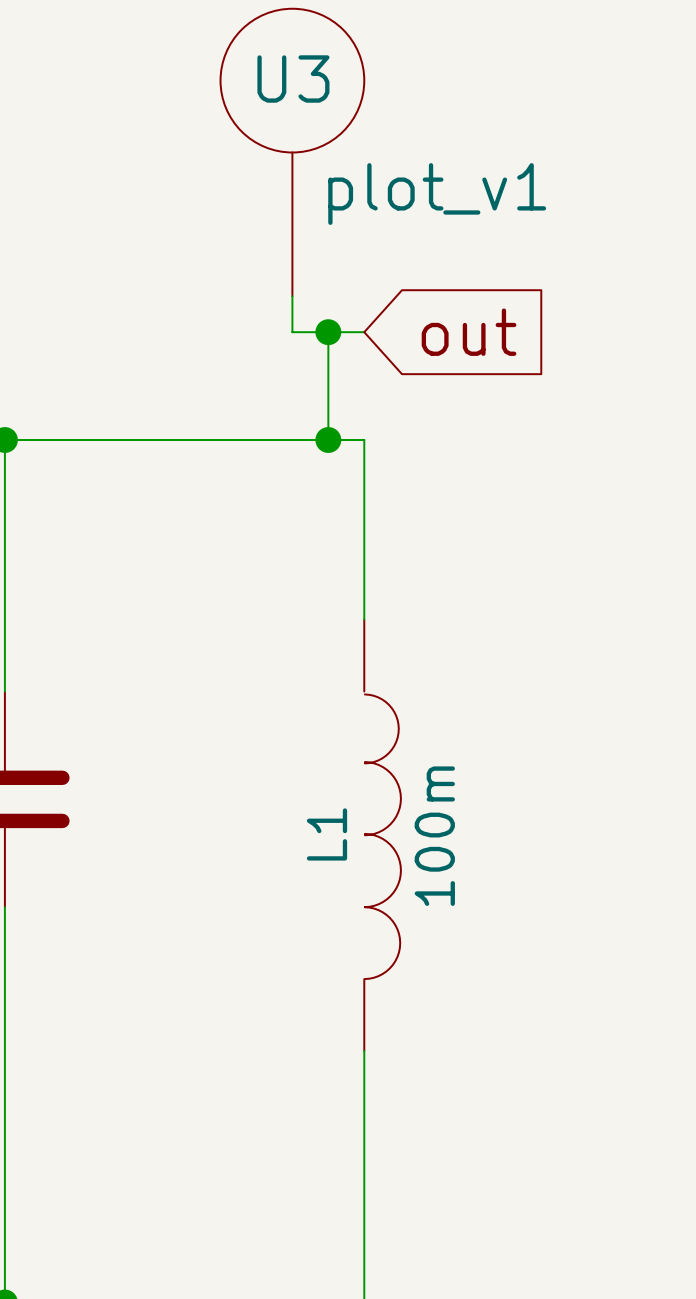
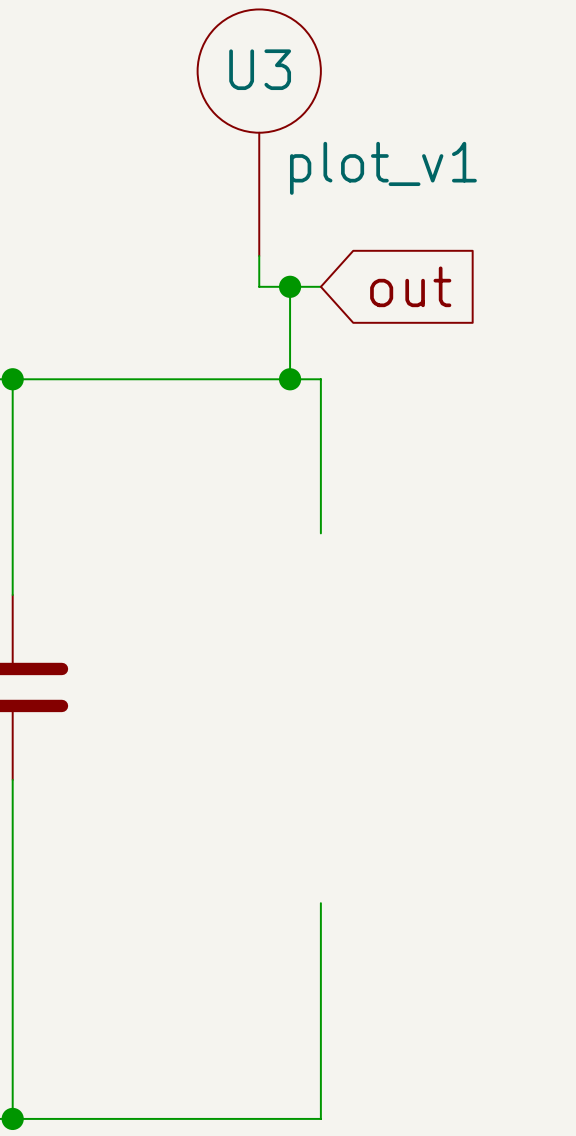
L1: 100m (382, 835) -> none

